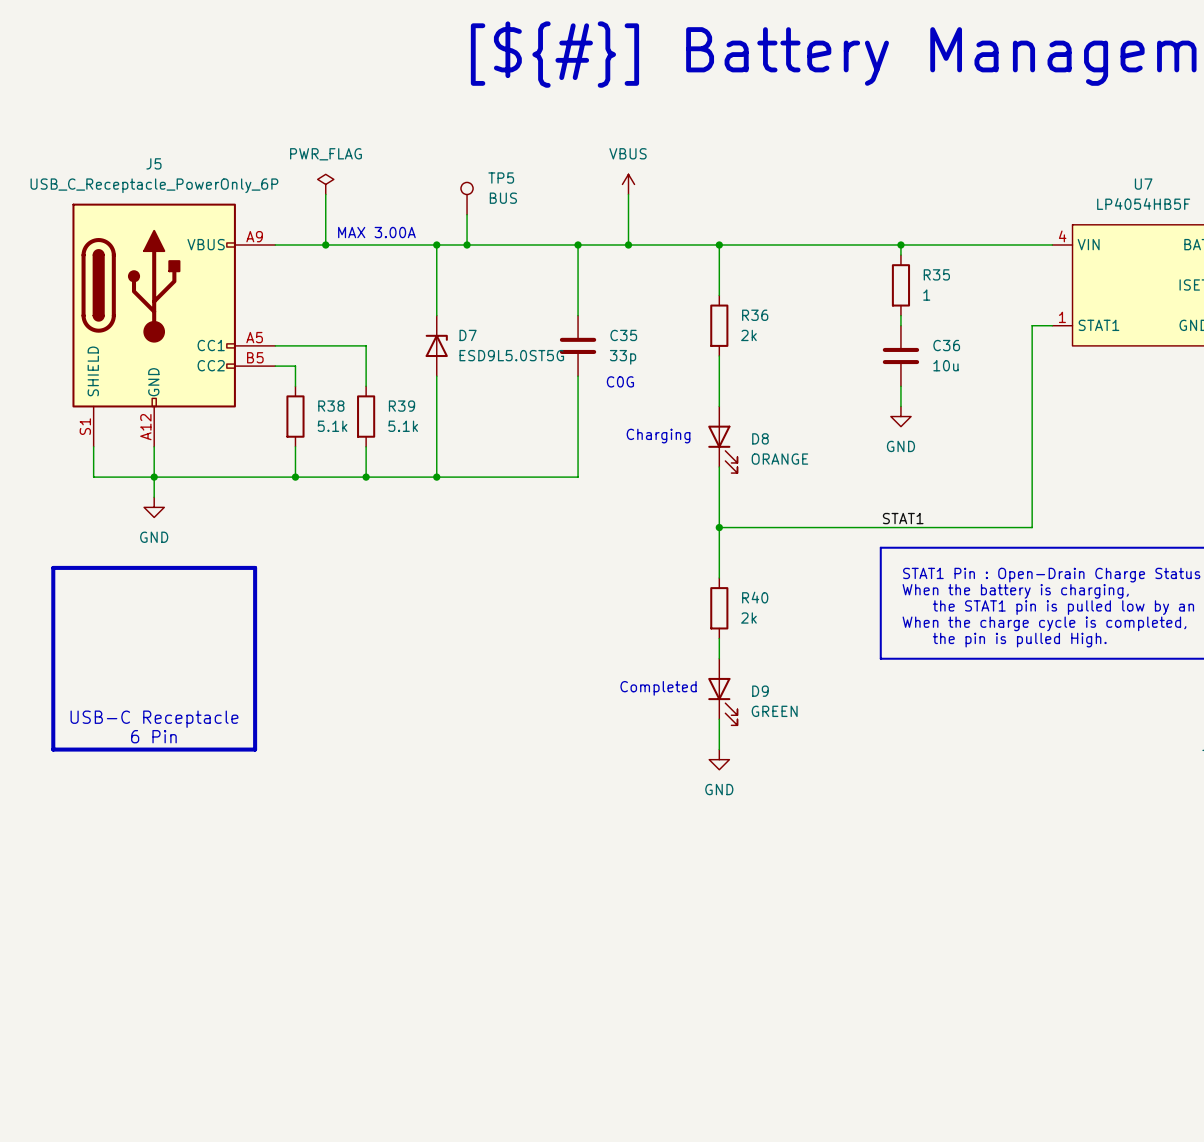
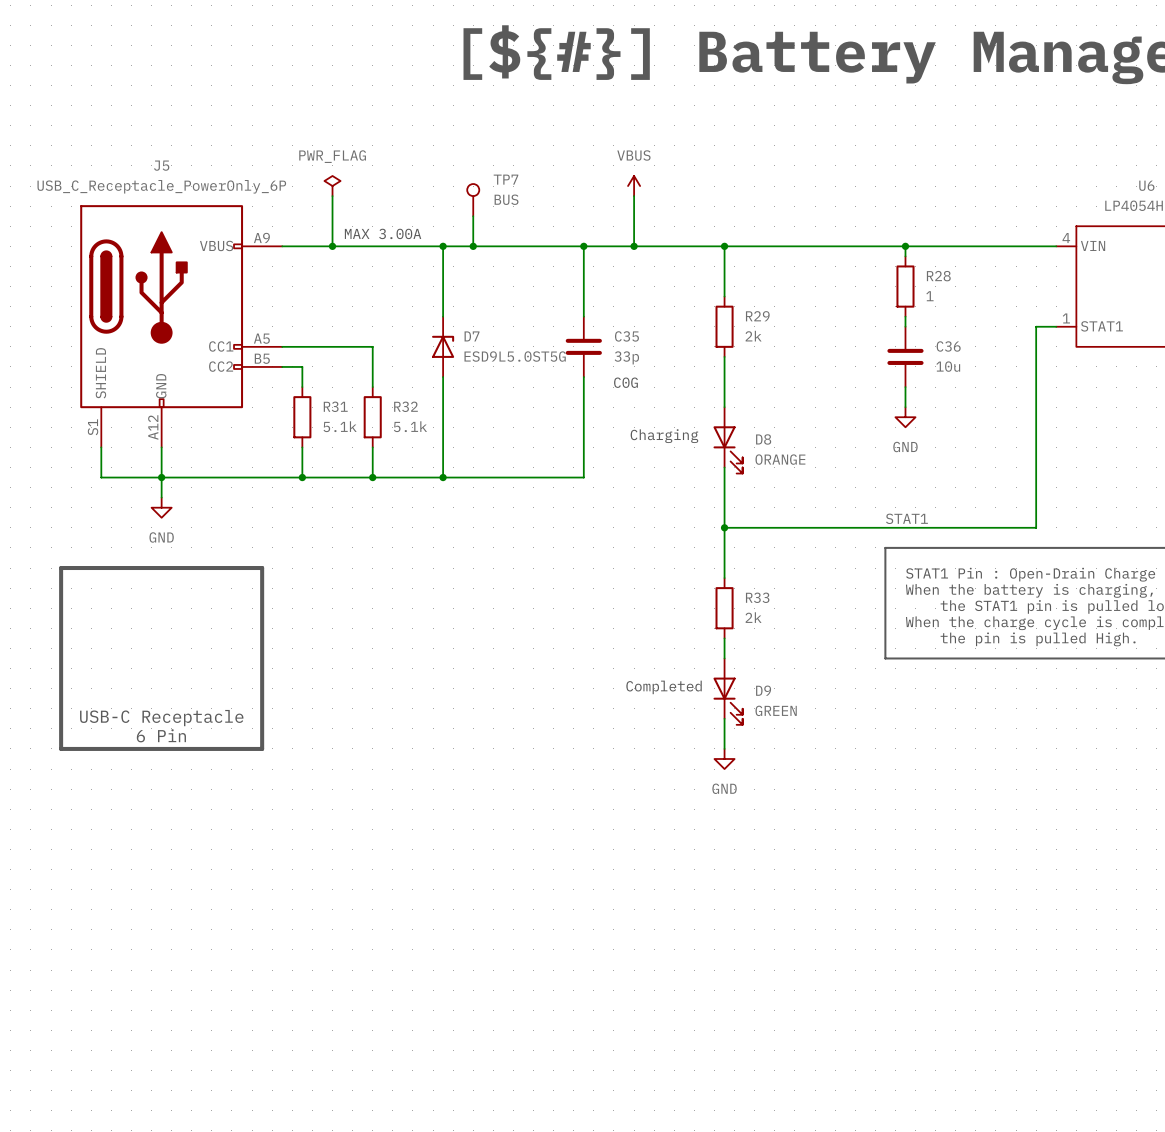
TP5 name: TP5 (501, 178) -> TP7 (505, 179)
U7 name: U7 (1143, 184) -> U6 (1146, 185)
R35 name: R35 (936, 274) -> R28 (938, 276)
R36 name: R36 (755, 315) -> R29 (757, 316)
R38 name: R38 (331, 406) -> R31 (335, 406)
R39 name: R39 (401, 406) -> R32 (405, 406)
R40 name: R40 (755, 597) -> R33 (757, 597)

